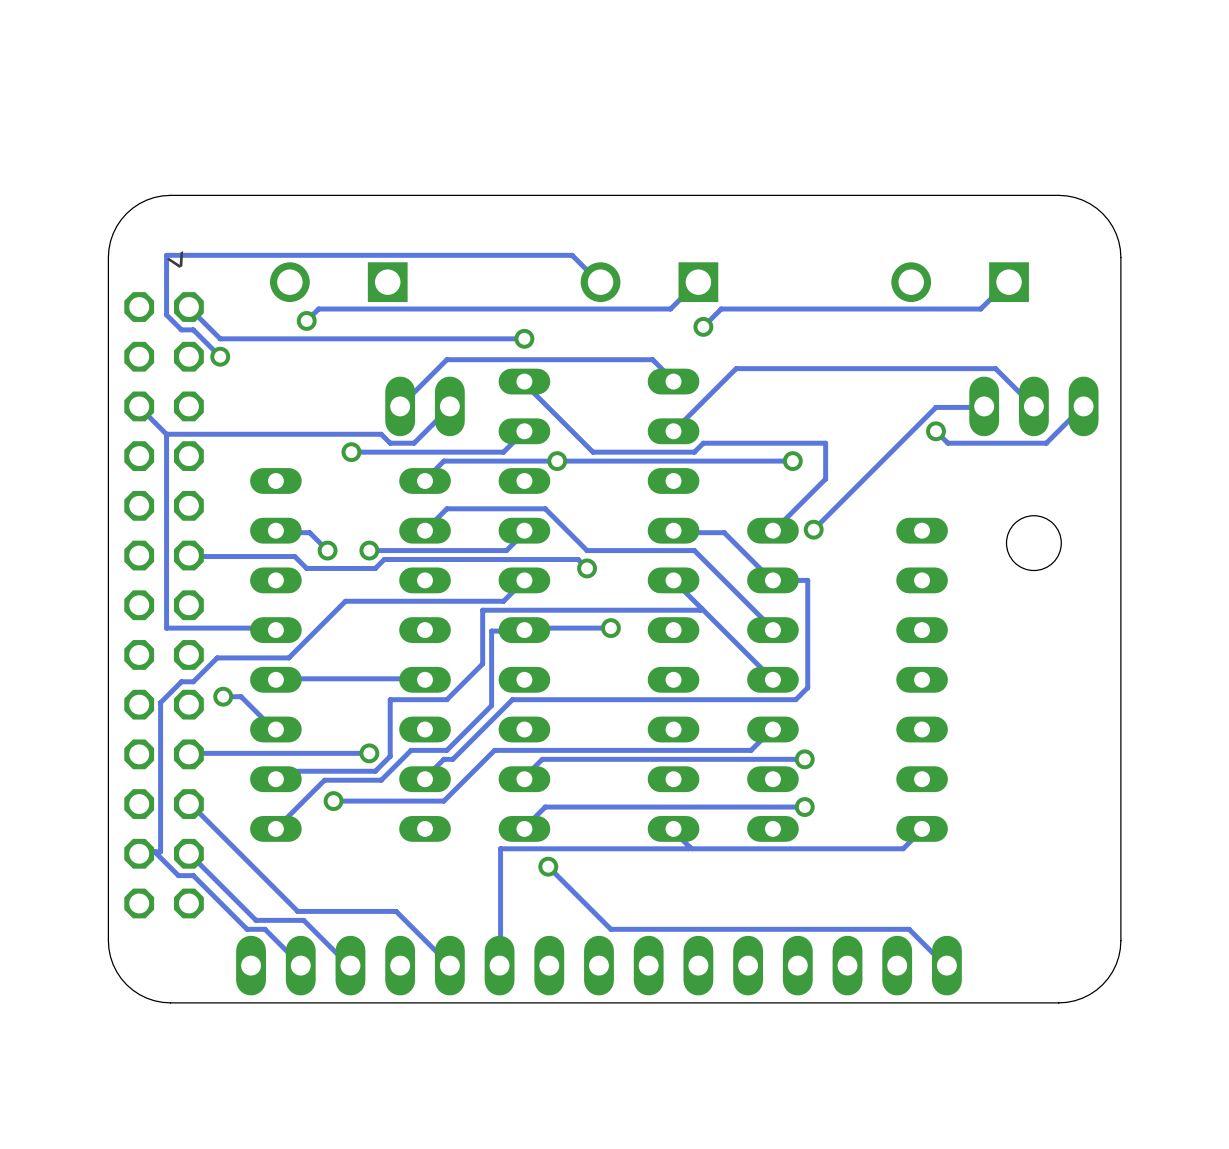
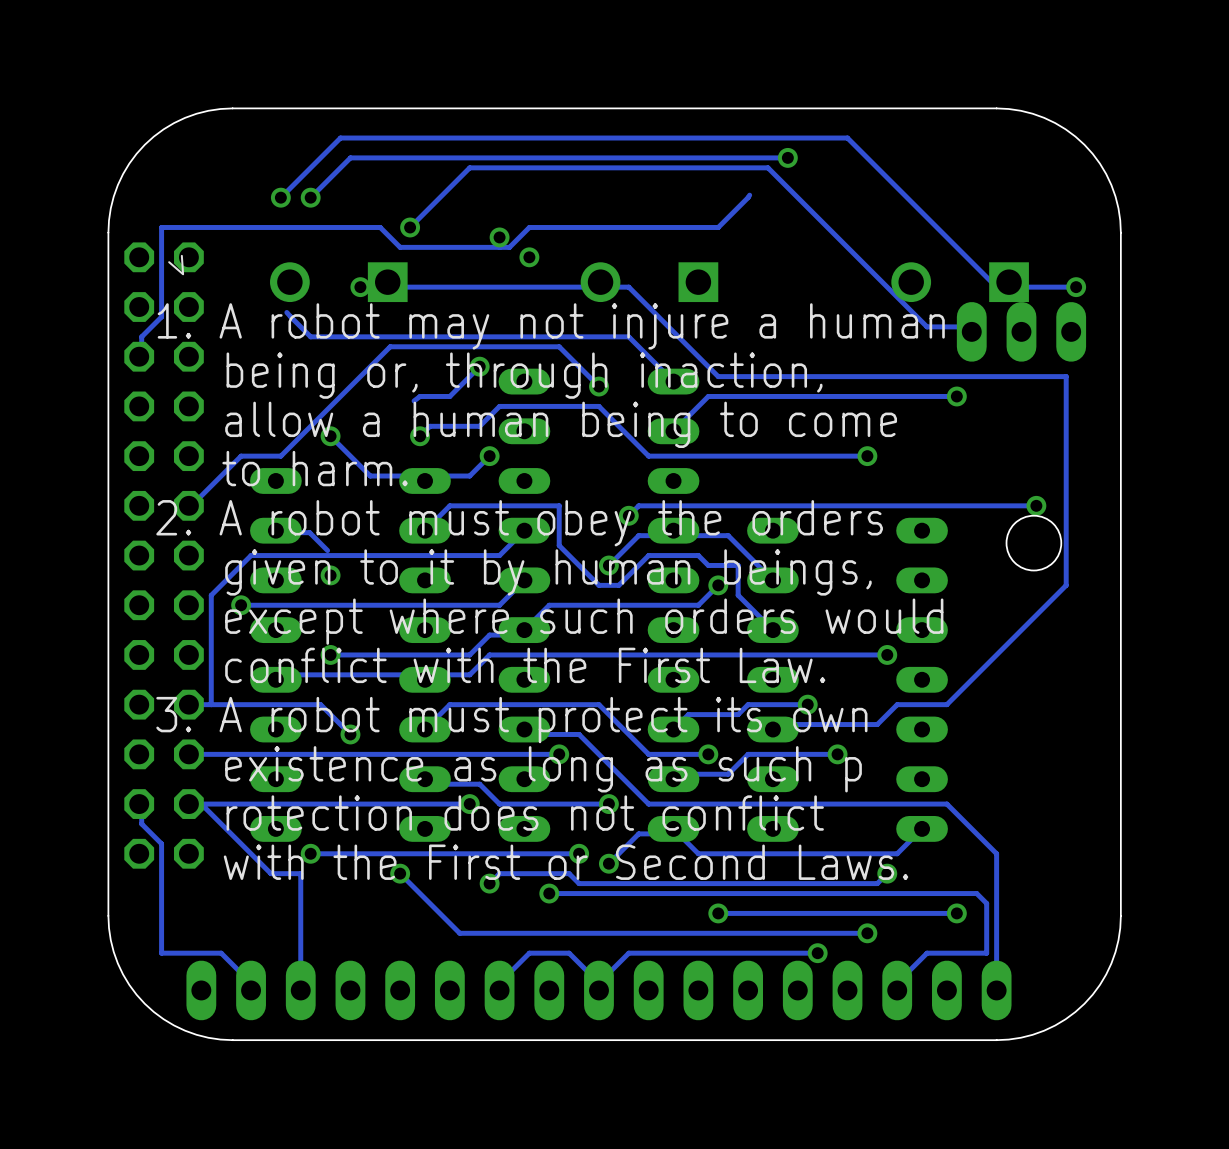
track: none -> (787, 157) (350, 157) (310, 197)
via: none -> (787, 157)
track: none -> (749, 195) (718, 227) (529, 227) (509, 247) (400, 247) (380, 227) (161, 227) (161, 316) (141, 336) (141, 356) (139, 356)
track: none -> (280, 197) (340, 138) (847, 138) (996, 287) (1076, 287)
via: none -> (280, 197)
via: none -> (310, 197)
track: none -> (410, 227) (469, 167) (767, 167) (927, 326) (966, 326) (971, 331)
via: none -> (410, 227)
via: none -> (499, 237)
via: none -> (529, 257)
board edge: (1120, 257) (1116, 233) (1102, 213) (1082, 200) (1058, 195) (170, 195) (146, 200) (126, 213) (113, 233) (108, 257) -> (1120, 257) (1120, 220) (1115, 196) (1106, 174) (1092, 153) (1075, 136) (1055, 123) (1032, 113) (996, 108) (232, 108) (208, 110) (185, 117) (163, 129) (144, 144) (129, 163) (117, 185) (110, 208) (108, 257)
track: (600, 282) (572, 255) (166, 255) (166, 314) (181, 329) (193, 329) (220, 356) -> none
track: (698, 282) (670, 309) (318, 309) (306, 320) -> none
track: (1009, 282) (980, 309) (721, 309) (703, 326) -> none
via: none -> (360, 287)
via: none -> (1076, 287)
track: (188, 307) (220, 338) (524, 338) -> none
via: (306, 320) -> none
text: none -> 1. A robot may not injure a human (551, 326)
via: (703, 326) -> none
via: (524, 338) -> none
via: (220, 356) -> none
track: none -> (479, 366) (449, 396) (420, 396) (414, 400)
via: none -> (479, 366)
text: none -> being or, through inaction, (524, 375)
track: (524, 381) (593, 452) (694, 452) (703, 443) (825, 443) (825, 478) (772, 530) -> none
track: (673, 381) (652, 359) (446, 359) (400, 406) -> (673, 381) (628, 336) (310, 336) (286, 312)
track: none -> (598, 386) (559, 346) (390, 346) (280, 456) (241, 456) (191, 505) (188, 505)
via: none -> (598, 386)
track: (708, 396) (736, 368) (995, 368) (1033, 406) -> (708, 396) (956, 396)
via: none -> (956, 396)
track: (139, 406) (166, 434) -> none
part: (425, 406) -> none
track: (449, 406) (414, 443) (390, 443) (381, 434) (166, 434) -> none
track: (984, 406) (935, 407) (813, 529) -> none
part position: (1033, 406) -> (1021, 331)
track: (1083, 406) (1046, 443) (947, 443) (935, 431) -> none
text: none -> allow a human being to come (561, 424)
track: (524, 431) (503, 452) (351, 452) -> none
via: (935, 431) -> none
track: (166, 434) (166, 628) (273, 628) (275, 630) -> none
track: none -> (330, 436) (370, 476) (420, 476) (425, 480) (429, 476) (469, 476) (489, 456)
track: none -> (420, 436) (429, 426) (479, 426) (499, 406) (598, 406) (648, 456) (867, 456)
via: none -> (420, 436)
via position: (351, 452) -> (330, 436)
via: none -> (489, 456)
via: none -> (867, 456)
via: (557, 461) -> none
track: (792, 461) (443, 461) (425, 480) -> none
via: (792, 461) -> none
text: none -> to harm. (315, 468)
track: none -> (1036, 505) (638, 505) (628, 515)
via: none -> (1036, 505)
track: (446, 508) (545, 508) (587, 550) (694, 550) (772, 630) -> (446, 508) (449, 505) (559, 505) (559, 545) (598, 585) (618, 585) (648, 555) (698, 555) (708, 565) (738, 565) (738, 595) (772, 630)
via: none -> (628, 515)
text: none -> 2. A robot must obey the orders (519, 523)
via: (813, 529) -> none
track: (524, 530) (506, 550) (369, 550) -> (524, 530) (499, 555) (251, 555) (211, 595) (211, 704)
track: (673, 530) (673, 532) (724, 532) (771, 580) (807, 580) (807, 687) (795, 699) (512, 699) (452, 759) (443, 759) (425, 779) -> (608, 804) (499, 804) (479, 784) (429, 784) (425, 779)
via: (327, 550) -> none
via: (369, 550) -> none
track: (188, 555) (294, 556) (306, 568) (375, 568) (384, 559) (578, 559) (587, 568) -> none
track: none -> (608, 565) (638, 535) (668, 535) (673, 530) (678, 535) (728, 535) (772, 580)
via position: (587, 568) -> (608, 565)
text: none -> given to it by human beings, (548, 572)
via: none -> (330, 575)
track: (673, 580) (772, 679) -> none
track: none -> (718, 585) (698, 605) (549, 605) (519, 635) (489, 635) (469, 654) (330, 654)
via: none -> (718, 585)
track: (503, 601) (345, 601) (288, 657) (217, 657) (193, 681) (181, 681) (160, 702) (160, 851) (139, 851) (139, 853) -> (503, 601) (499, 605) (241, 605)
part position: (164, 605) -> (164, 555)
via: none -> (241, 605)
track: (701, 608) (482, 610) (482, 663) (446, 699) (390, 699) (390, 756) (375, 771) (282, 771) (275, 779) -> none
text: none -> except where such orders would (584, 621)
track: (610, 628) (524, 628) (524, 631) (491, 631) (491, 705) (446, 750) (411, 750) (381, 780) (324, 780) (275, 828) -> none
via: (610, 628) -> none
via: none -> (330, 654)
via: none -> (887, 654)
text: none -> conflict with the First Law. (525, 665)
track: (276, 678) (425, 679) -> (276, 678) (280, 674) (420, 674) (425, 679) (429, 674) (469, 674) (489, 654) (887, 654)
track: (223, 696) (241, 696) (275, 729) -> none
via: (223, 696) -> none
track: none -> (188, 704) (320, 704) (350, 734)
track: none -> (807, 704) (748, 704) (738, 714) (688, 714) (673, 729)
via: none -> (807, 704)
text: none -> 3. A robot must protect its own (511, 720)
track: none -> (425, 729) (449, 704) (598, 704) (648, 754) (708, 754)
track: none -> (524, 729) (529, 734) (579, 734) (648, 804) (946, 804) (996, 853) (996, 990)
track: (772, 729) (751, 750) (494, 750) (443, 801) (333, 801) -> (772, 729) (777, 724) (877, 724) (897, 704) (946, 704) (1066, 585) (1066, 376) (718, 376) (628, 287) (360, 287)
track: (369, 753) (188, 754) -> (559, 754) (188, 754)
via position: (369, 753) -> (350, 734)
via: none -> (559, 754)
via: none -> (708, 754)
track: none -> (837, 754) (748, 754) (728, 774) (678, 774) (673, 779)
via: none -> (837, 754)
track: (804, 759) (542, 759) (524, 779) -> none
via: (804, 759) -> none
text: none -> existence as long as such p (543, 769)
via: (333, 801) -> none
track: none -> (139, 804) (141, 804) (141, 823) (161, 843) (161, 953) (221, 953) (251, 983) (251, 990)
track: (190, 804) (297, 911) (396, 911) (449, 965) -> (190, 804) (469, 804)
via: none -> (469, 804)
via: none -> (608, 804)
track: (804, 807) (545, 807) (524, 828) -> none
via: (804, 807) -> none
text: none -> rotection does not conflict (525, 813)
track: (922, 828) (903, 848) (691, 848) (673, 828) -> (922, 828) (897, 853) (698, 853) (673, 828) (668, 833) (638, 833) (608, 863)
track: (689, 847) (500, 848) (499, 965) -> none
track: (154, 851) (178, 875) (193, 875) (247, 929) (264, 929) (300, 965) -> (201, 804) (270, 873) (300, 873) (300, 965)
track: (188, 853) (256, 920) (303, 920) (350, 965) -> none
via: none -> (310, 853)
track: none -> (579, 853) (310, 853)
via: none -> (579, 853)
text: none -> with the First or Second Laws. (566, 862)
via: none -> (608, 863)
track: (548, 866) (610, 929) (909, 929) (946, 965) -> none
via: (548, 866) -> none
track: none -> (400, 873) (459, 933) (867, 933)
via: none -> (400, 873)
track: none -> (887, 873) (877, 883) (579, 883) (569, 873) (499, 873) (489, 883)
via: none -> (887, 873)
via: none -> (489, 883)
track: none -> (549, 893) (976, 893) (986, 903) (986, 953) (927, 953) (897, 983) (897, 990)
via: none -> (549, 893)
via: none -> (718, 913)
track: none -> (956, 913) (718, 913)
via: none -> (956, 913)
board edge: (1120, 915) (1118, 956) (1108, 978) (1096, 990) (1082, 998) (1058, 1002) (162, 1002) (146, 998) (132, 990) (116, 971) (108, 948) (108, 915) -> (1120, 915) (1118, 940) (1111, 963) (1099, 984) (1084, 1003) (1065, 1019) (1044, 1030) (1020, 1037) (996, 1040) (220, 1039) (196, 1034) (174, 1025) (153, 1011) (136, 994) (123, 974) (113, 951) (108, 915)
via: none -> (867, 933)
track: none -> (817, 953) (628, 953) (598, 983)
via: none -> (817, 953)
part position: (400, 965) -> (350, 990)
part: (772, 965) -> none
track: none -> (598, 983) (569, 953) (529, 953) (499, 983) (499, 990)
part: none -> (772, 990)

